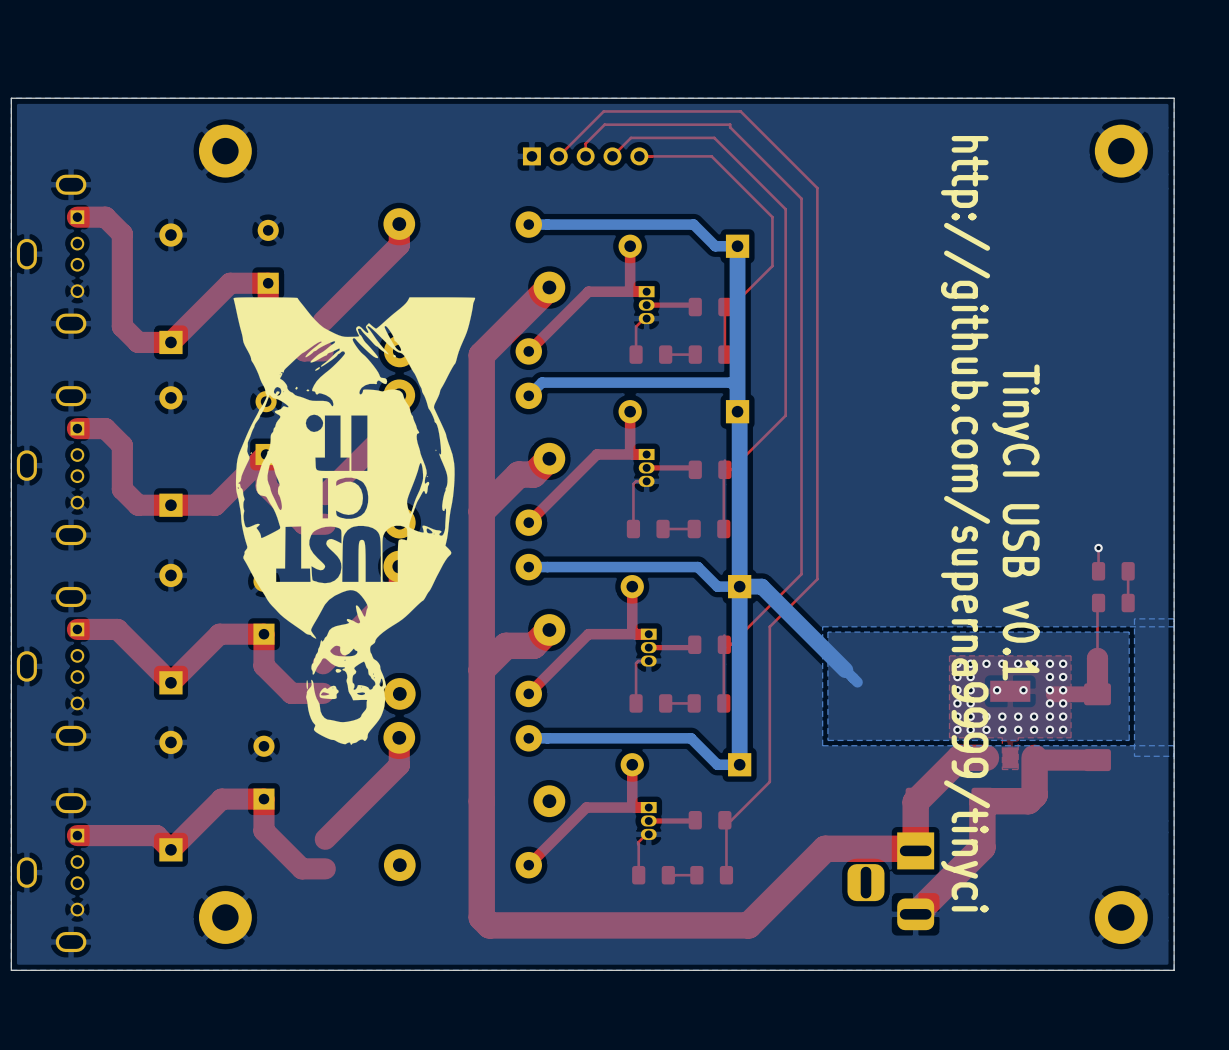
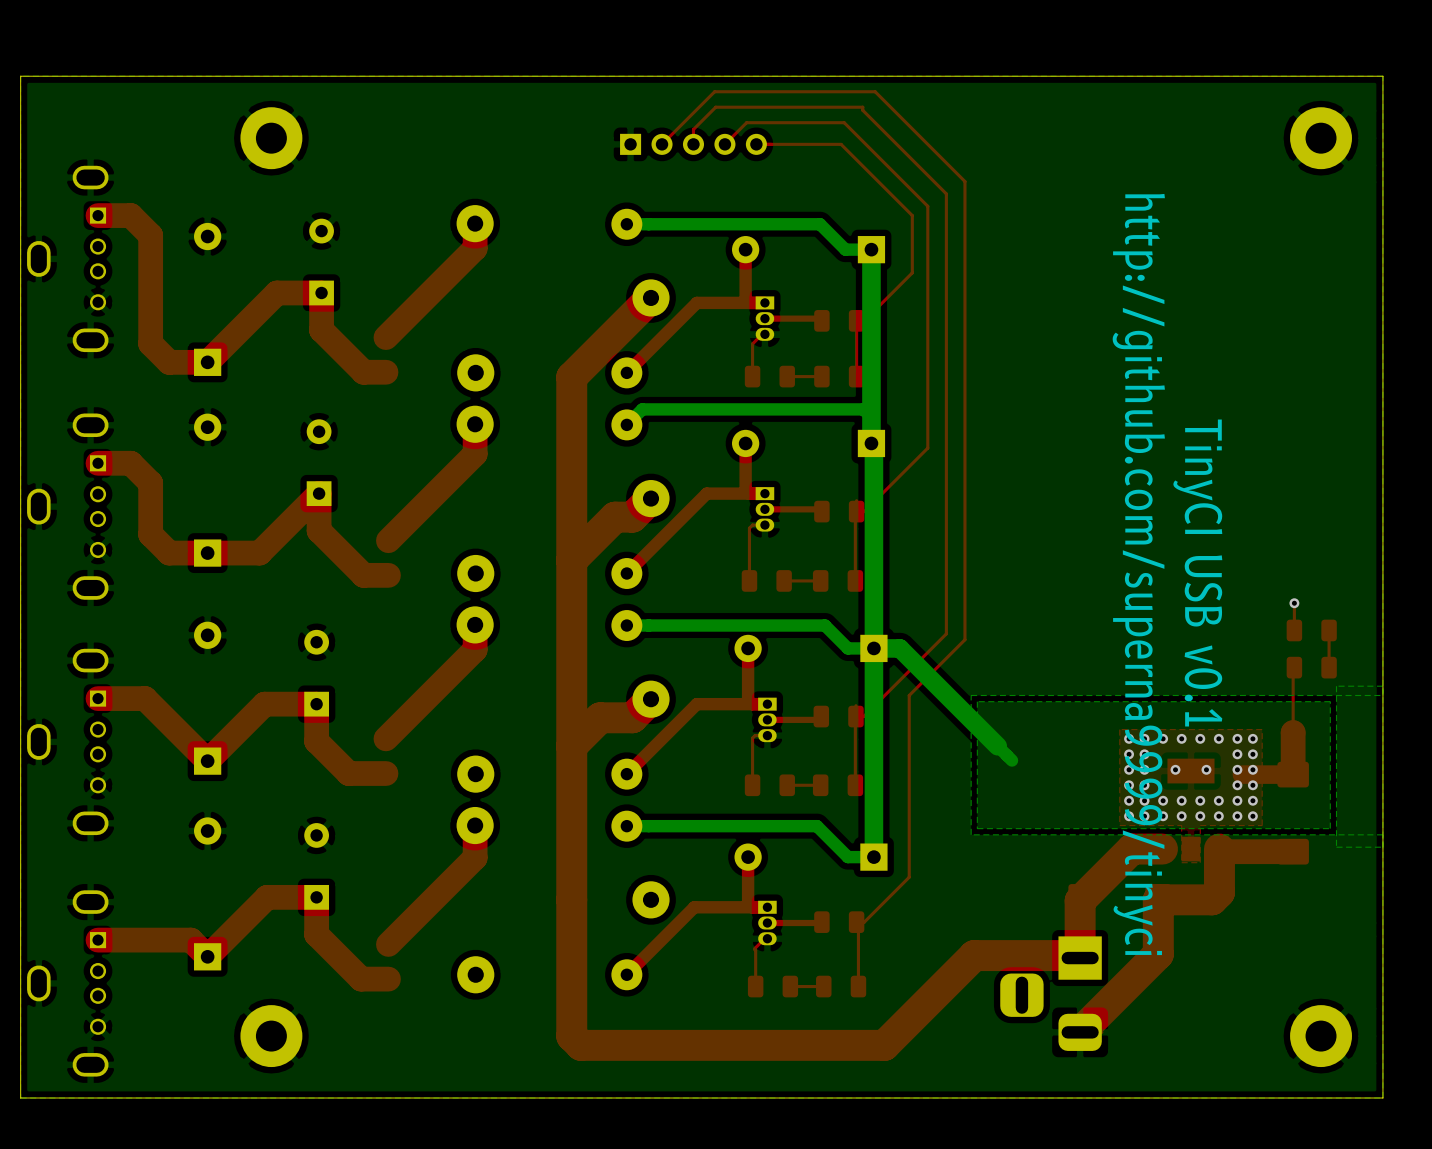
drawing: [233, 297, 476, 745] -> none

